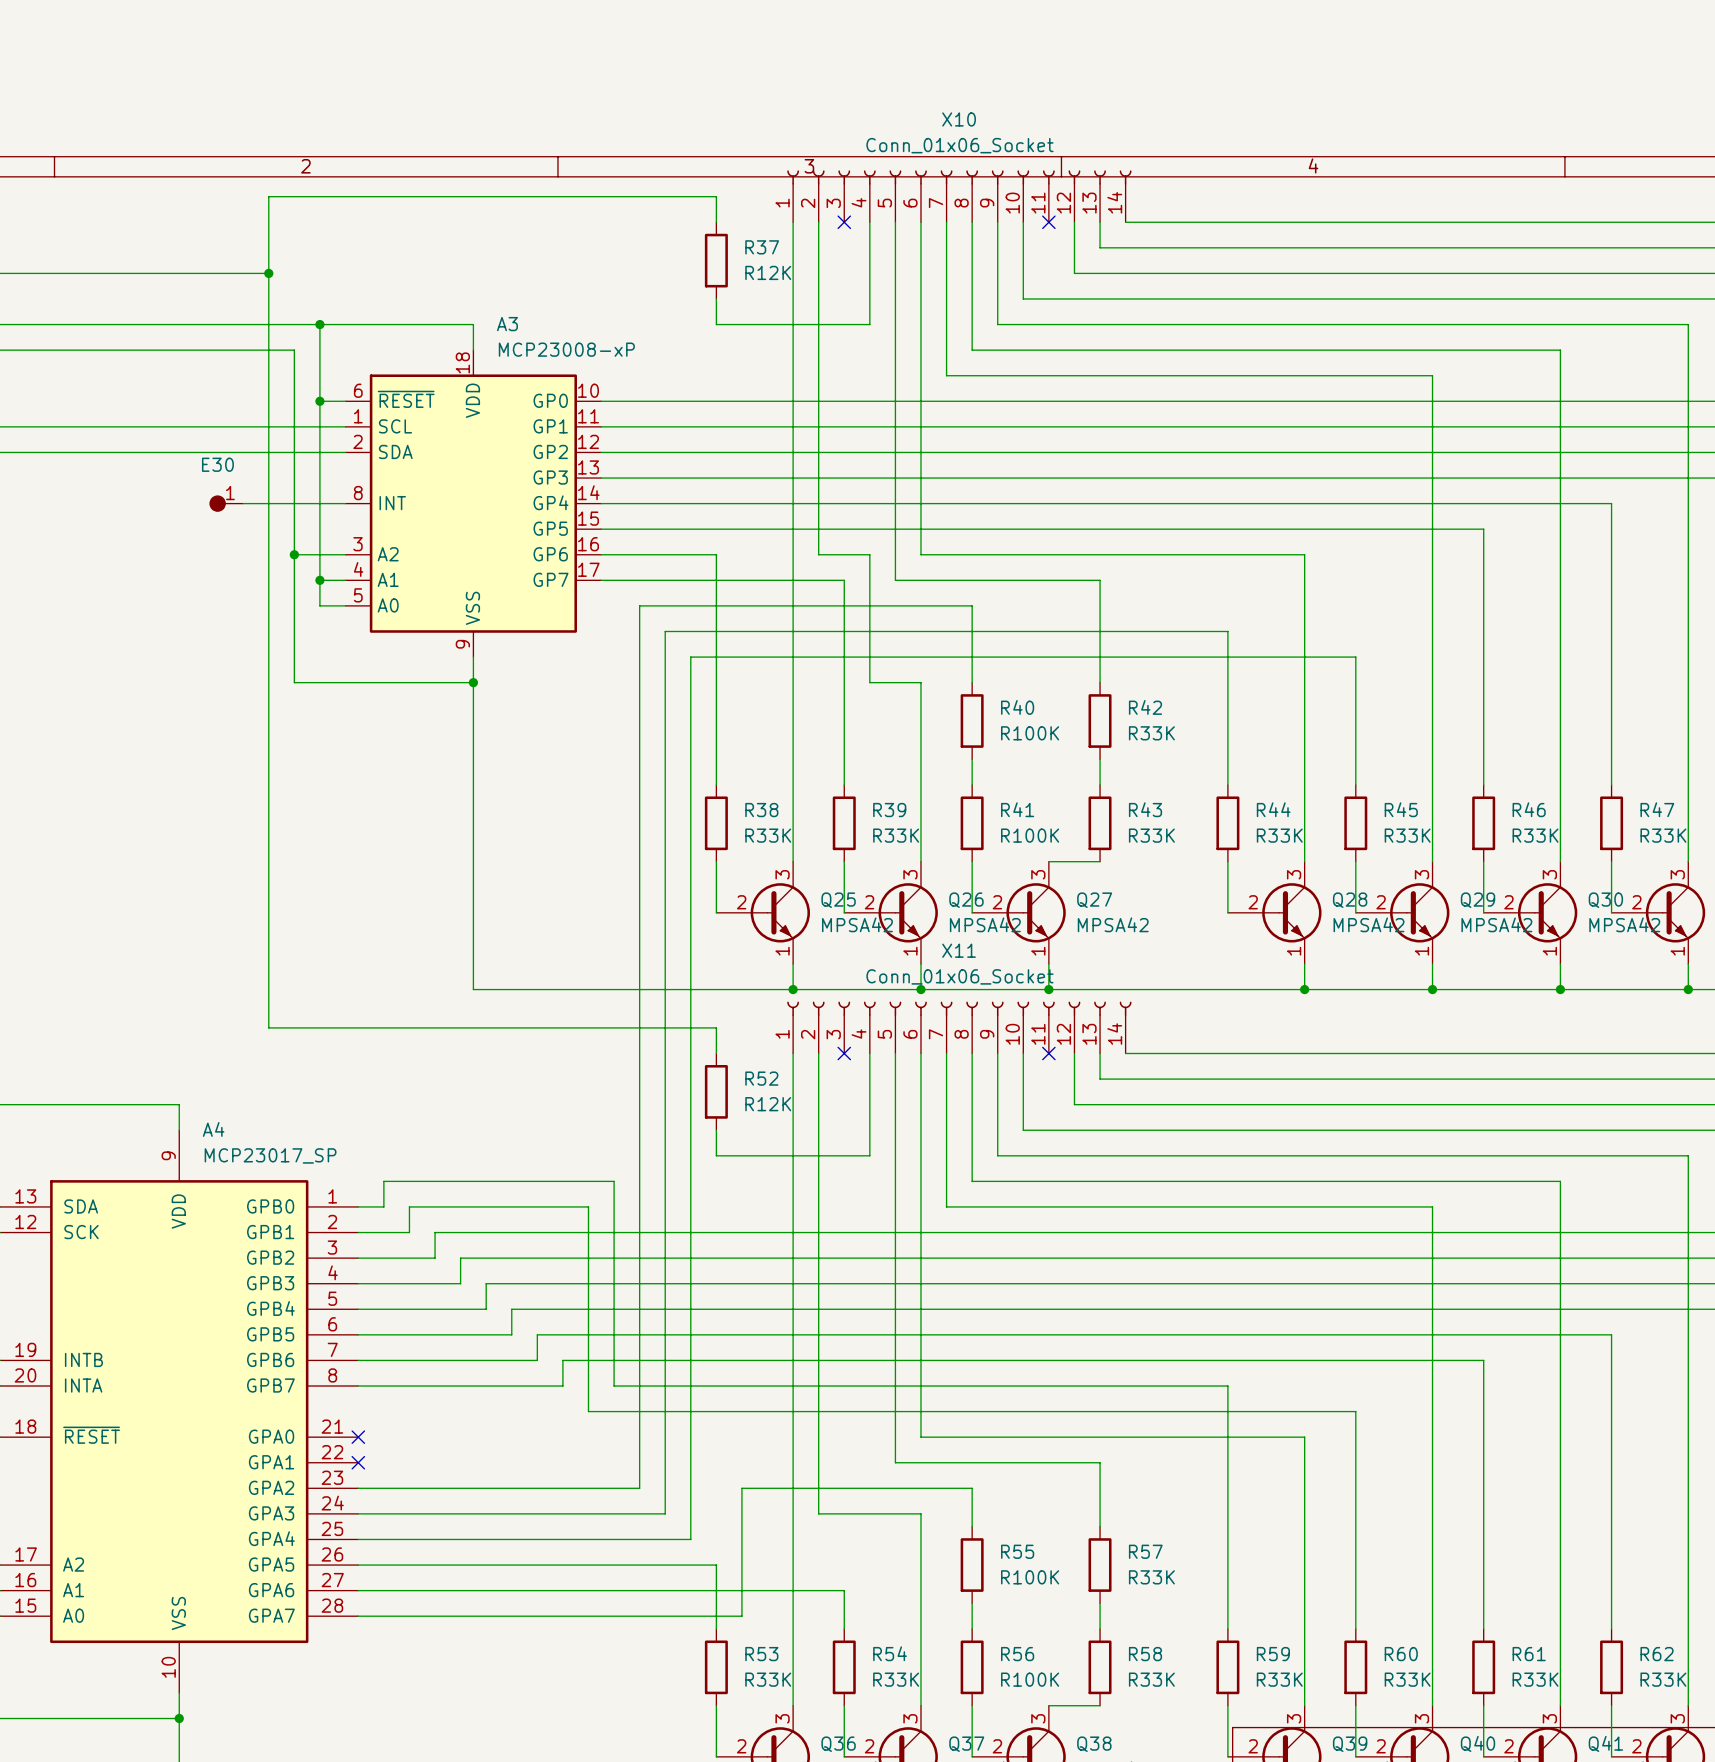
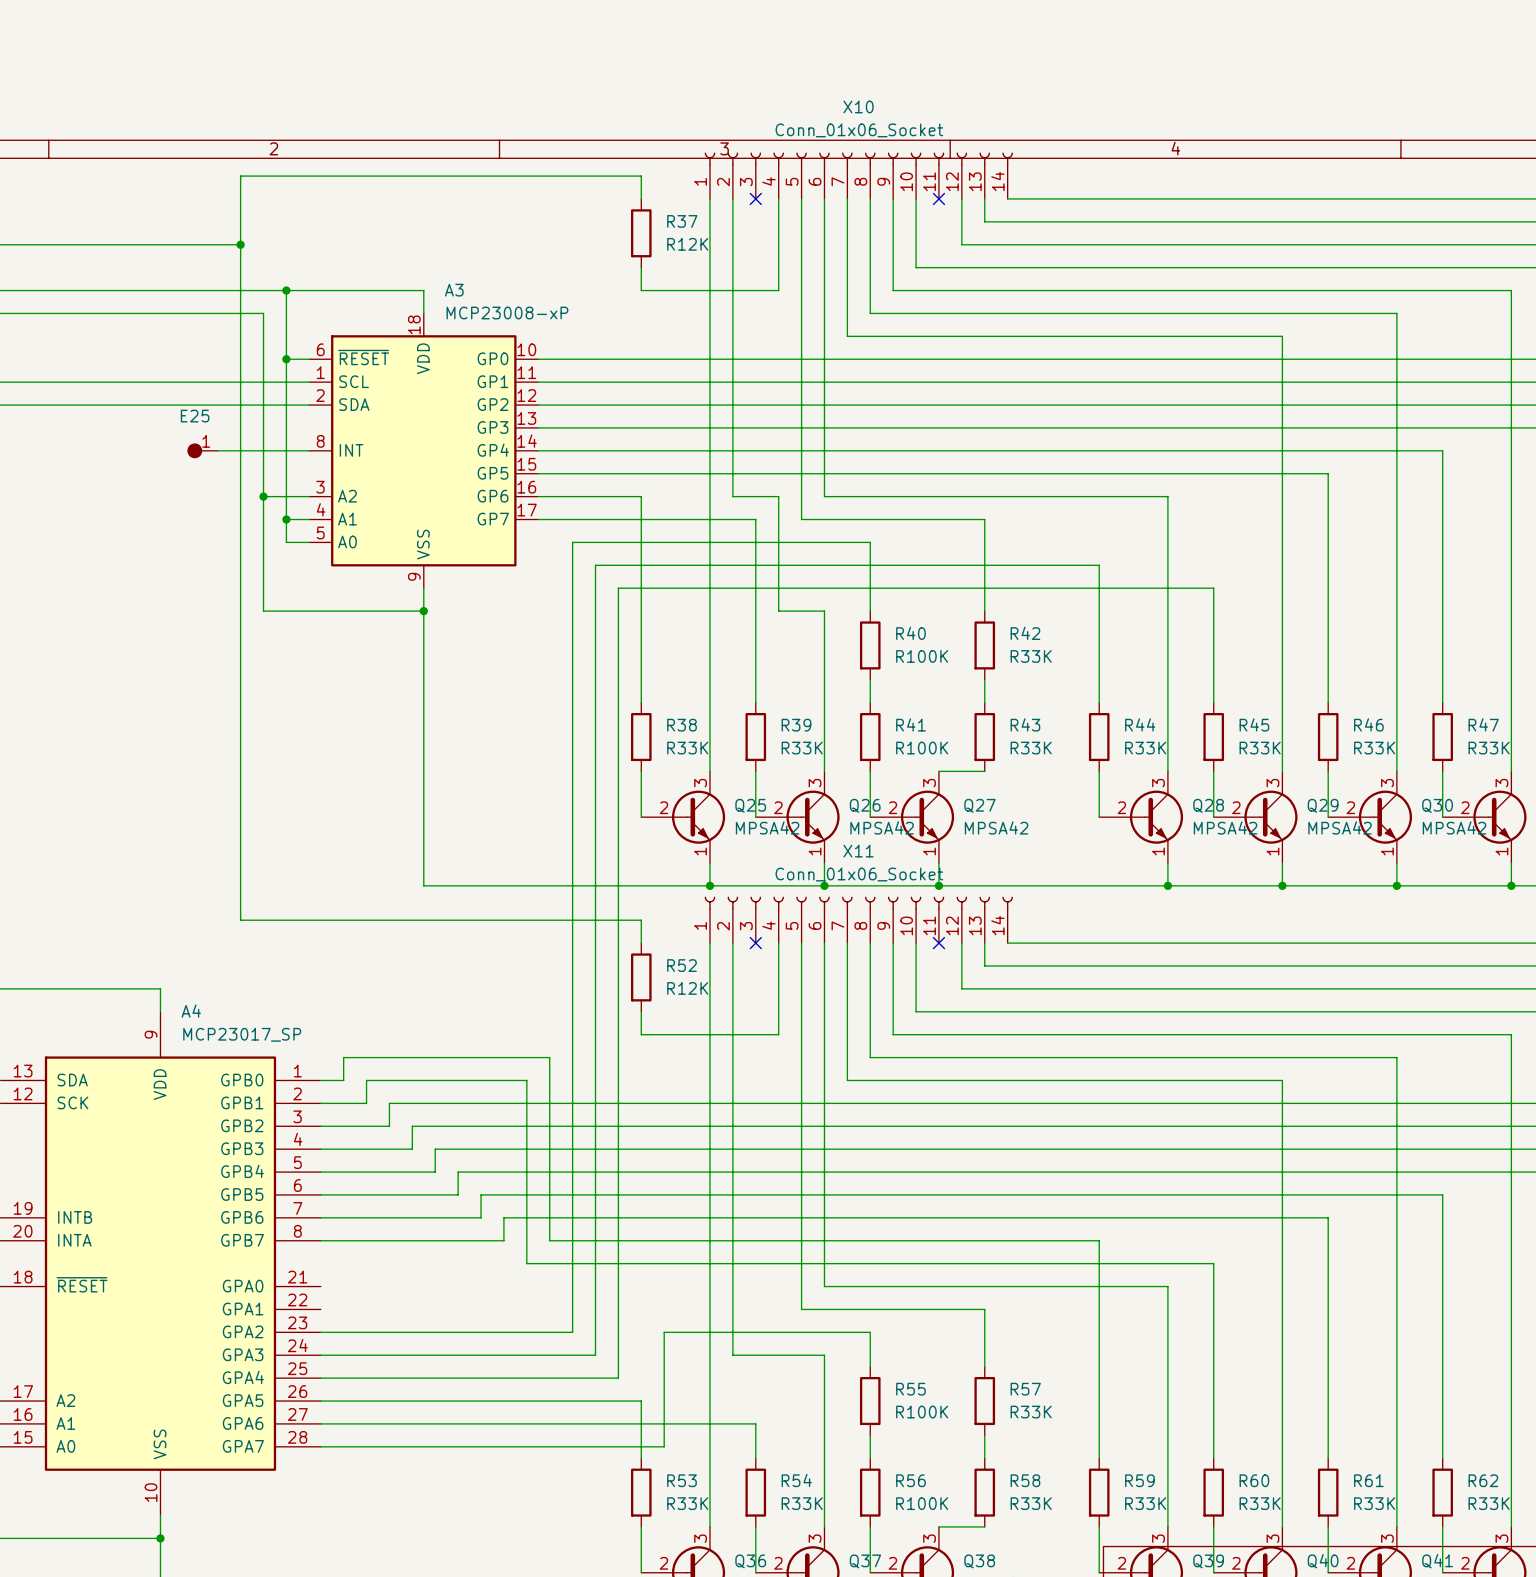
E30 name: E30 (217, 464) -> E25 (195, 416)
no-connect mark: (358, 1437) -> none
no-connect mark: (358, 1462) -> none

